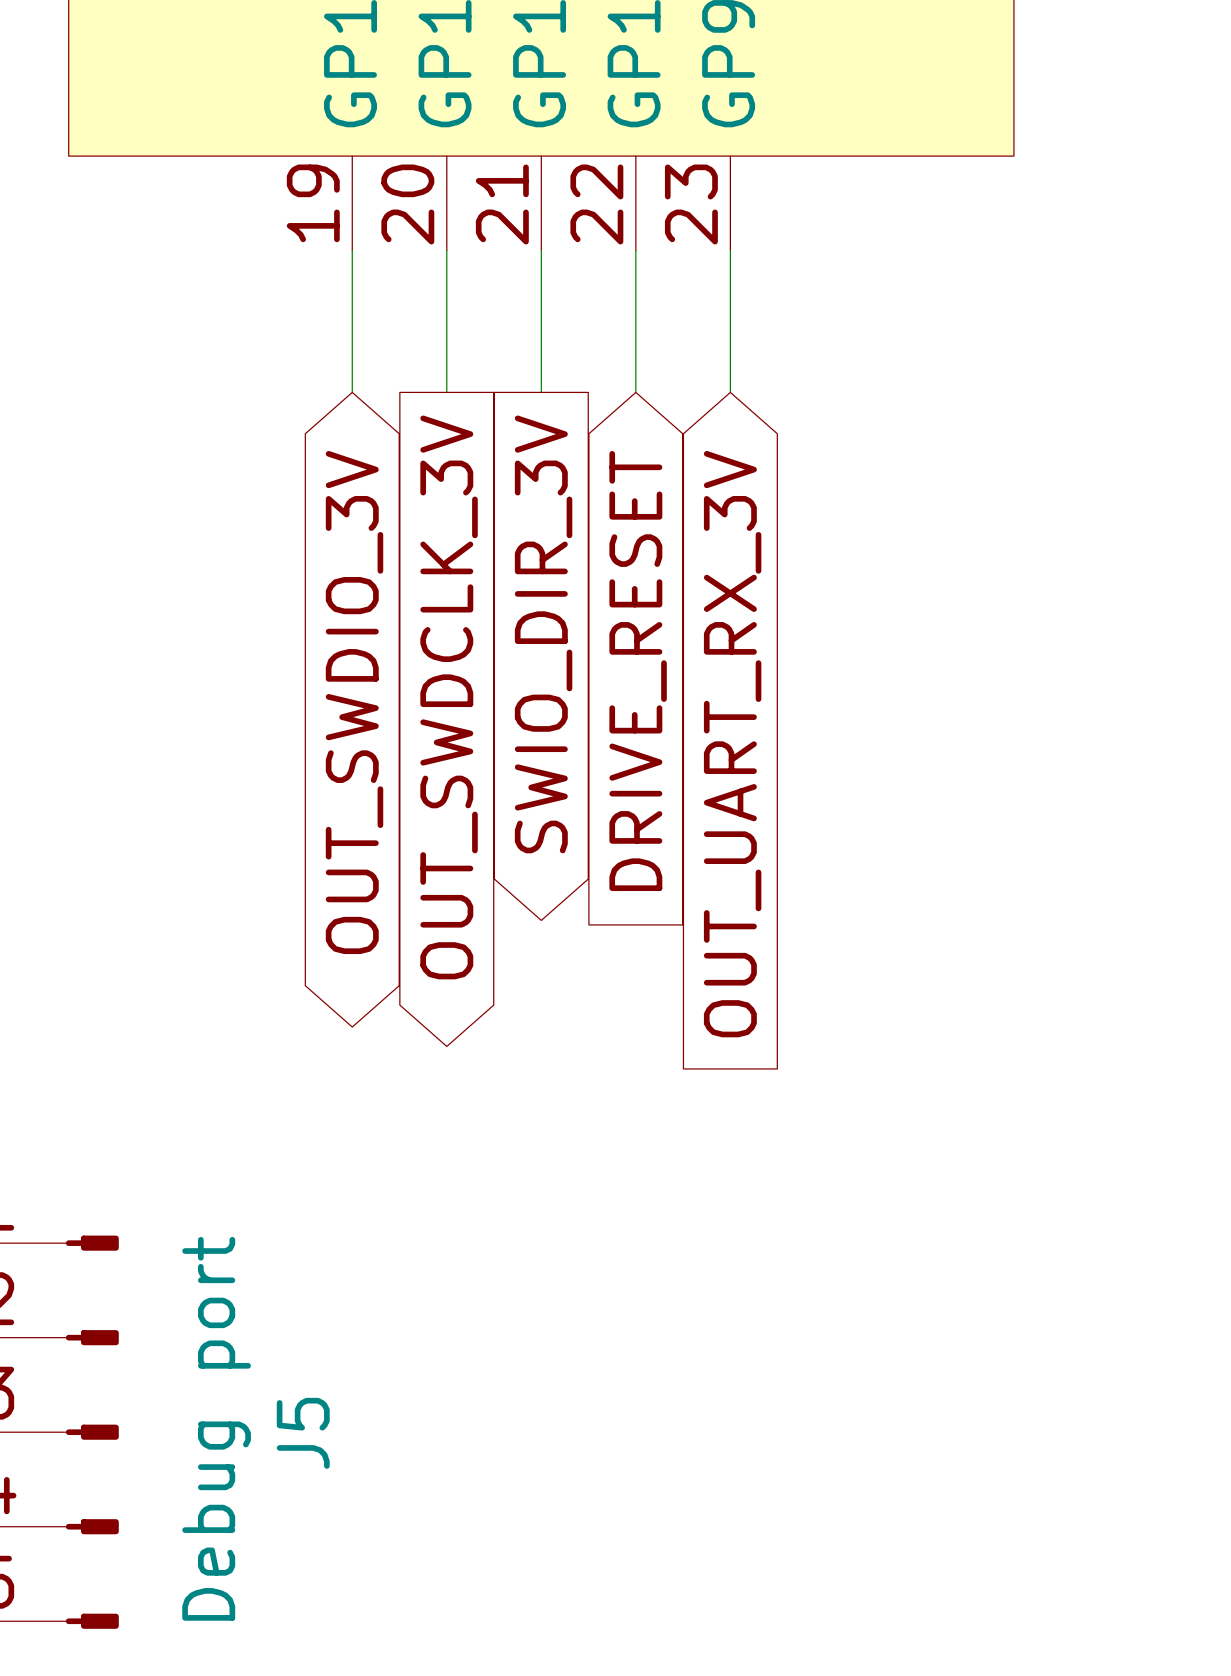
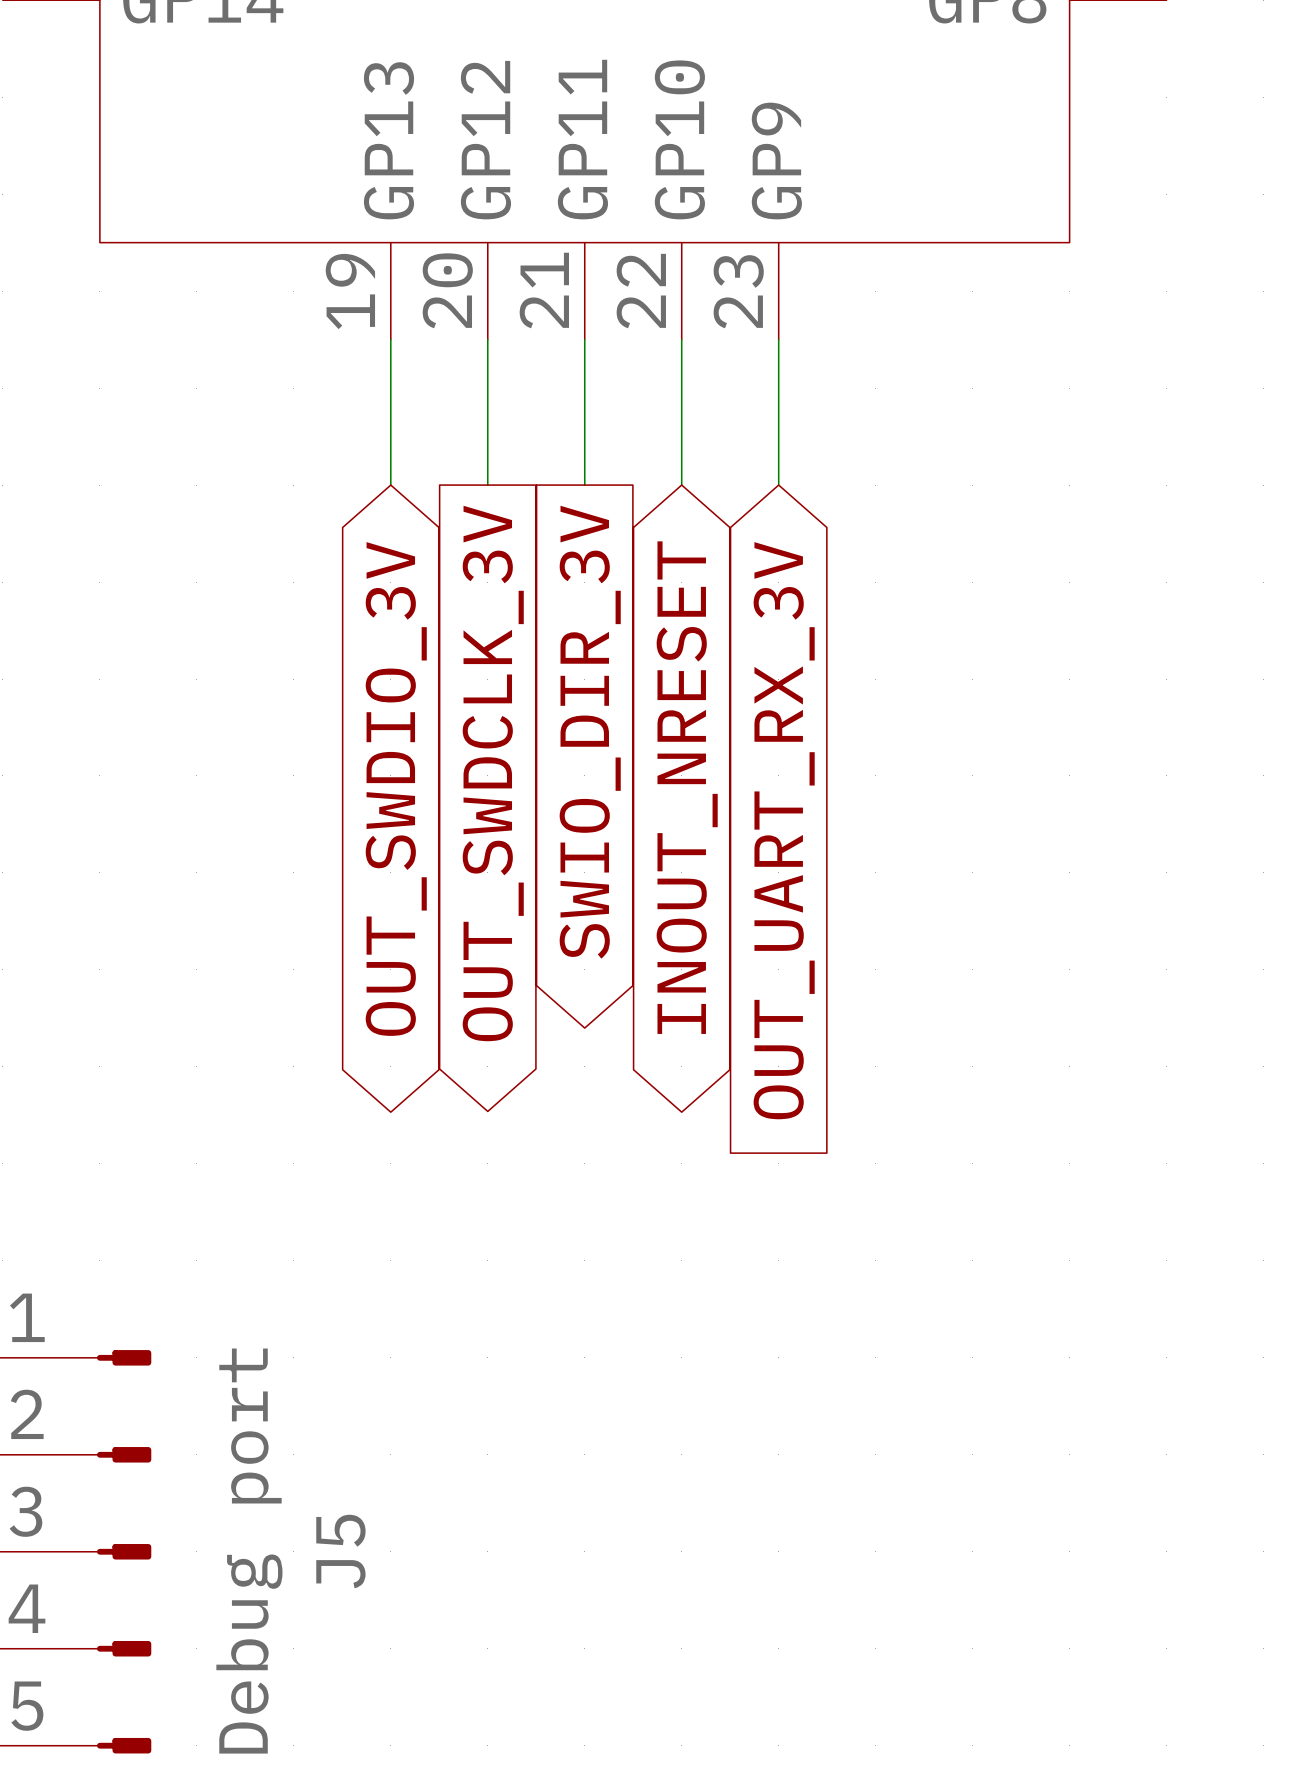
global label shape: input (638, 671) -> bidirectional (687, 787)
global label: DRIVE_RESET (638, 671) -> INOUT_NRESET (687, 787)

